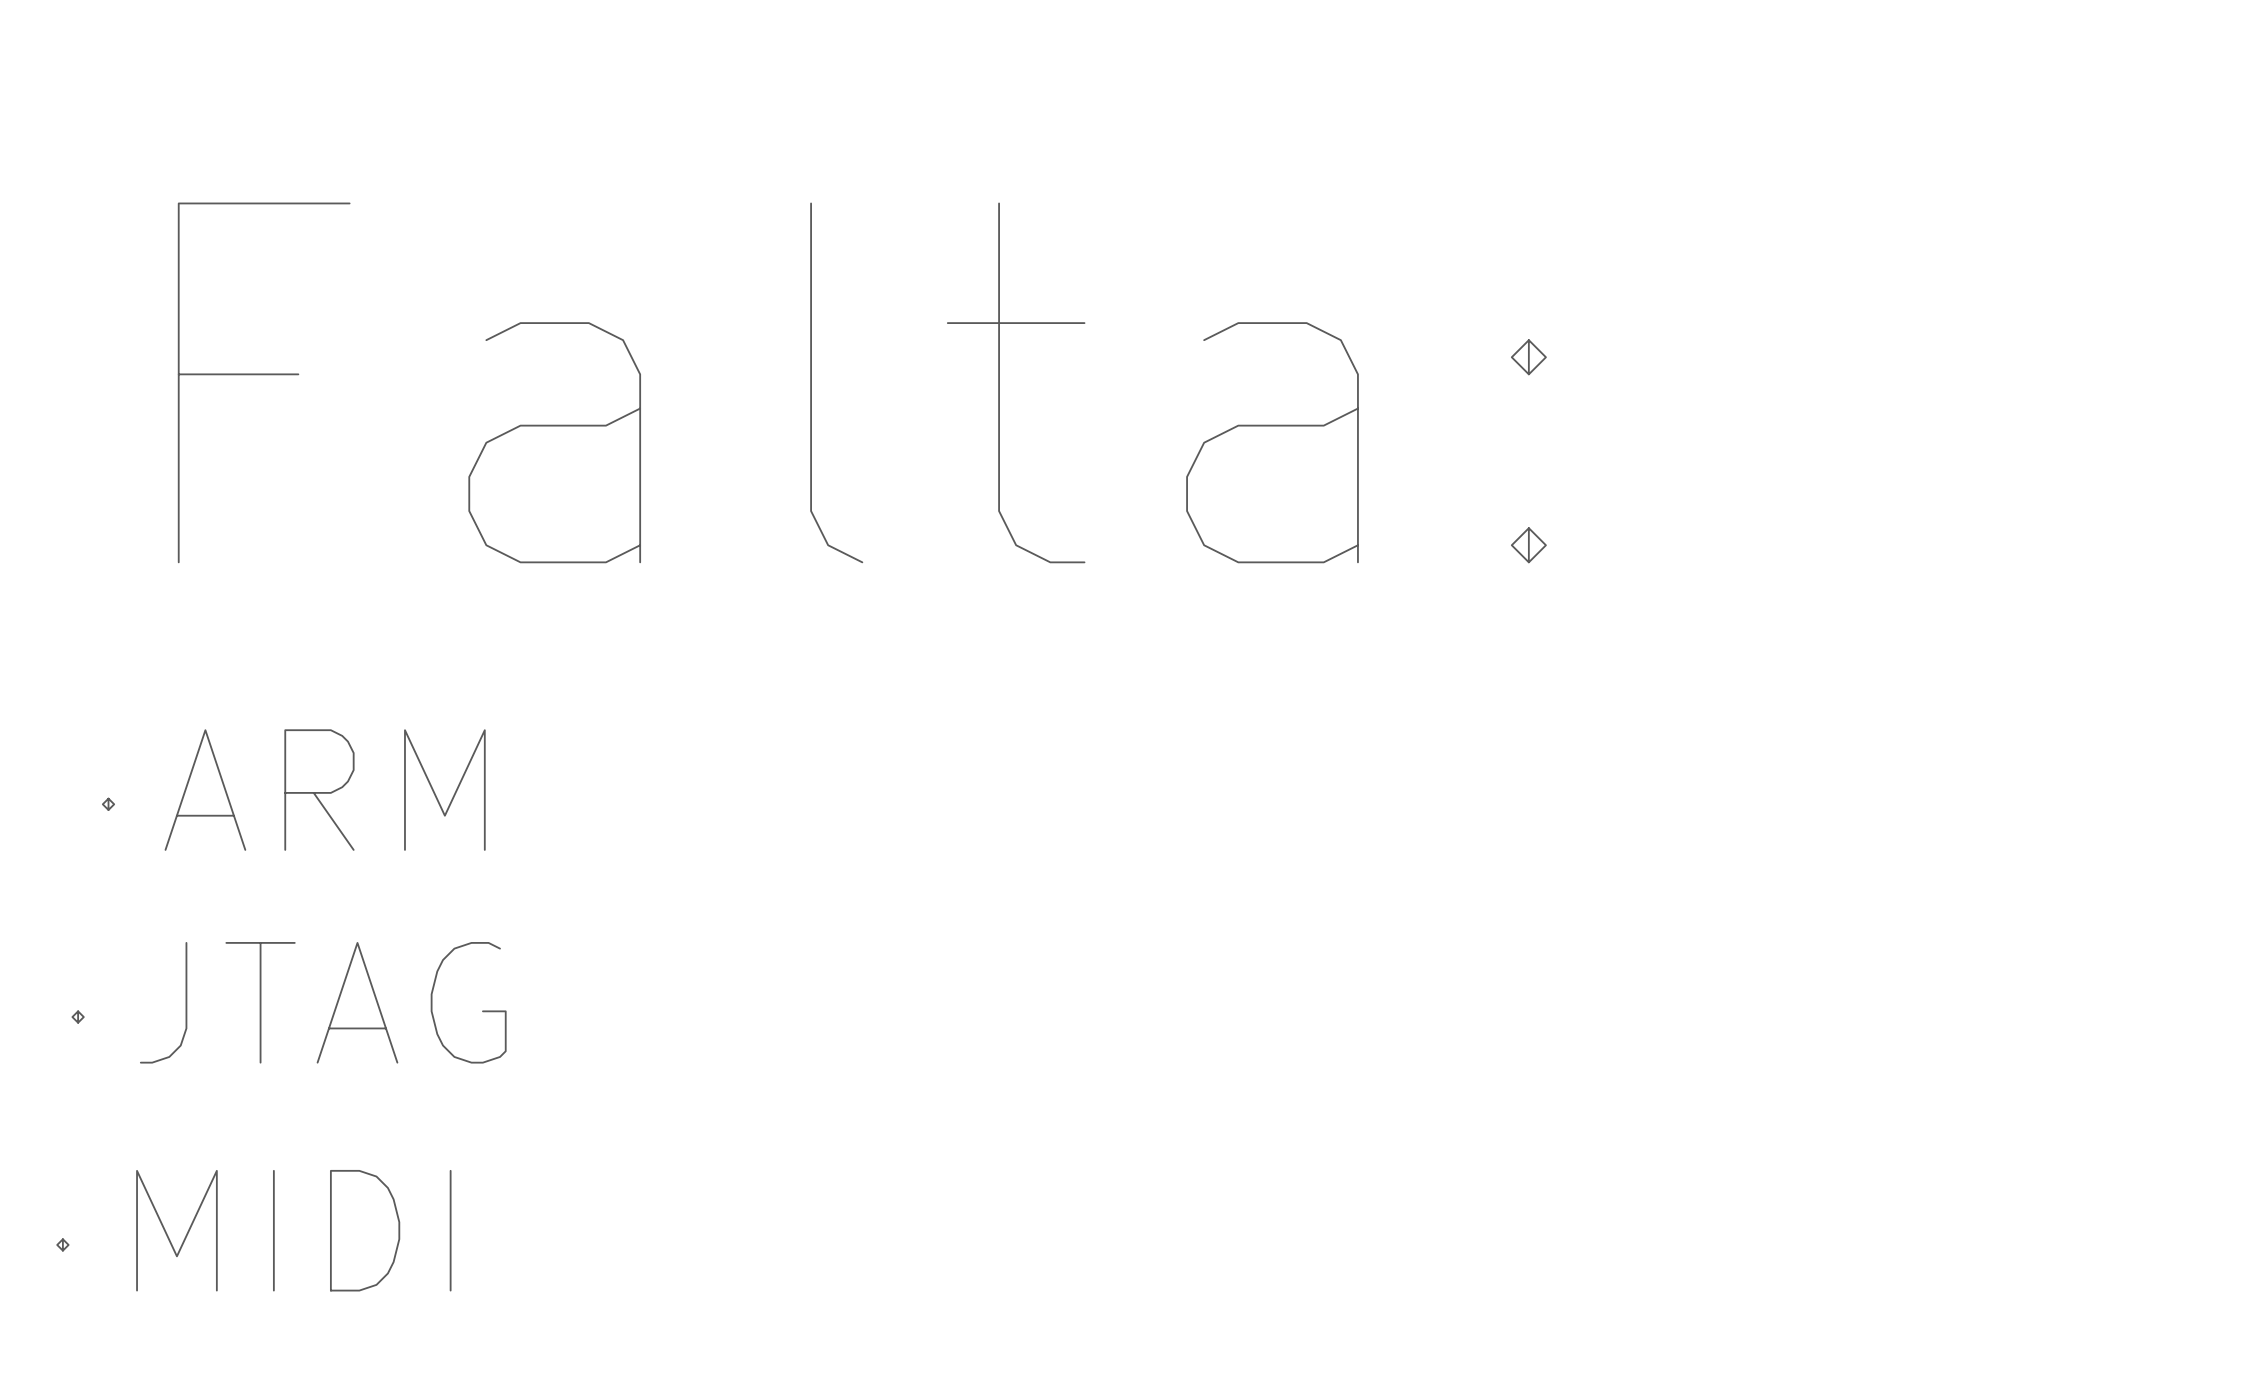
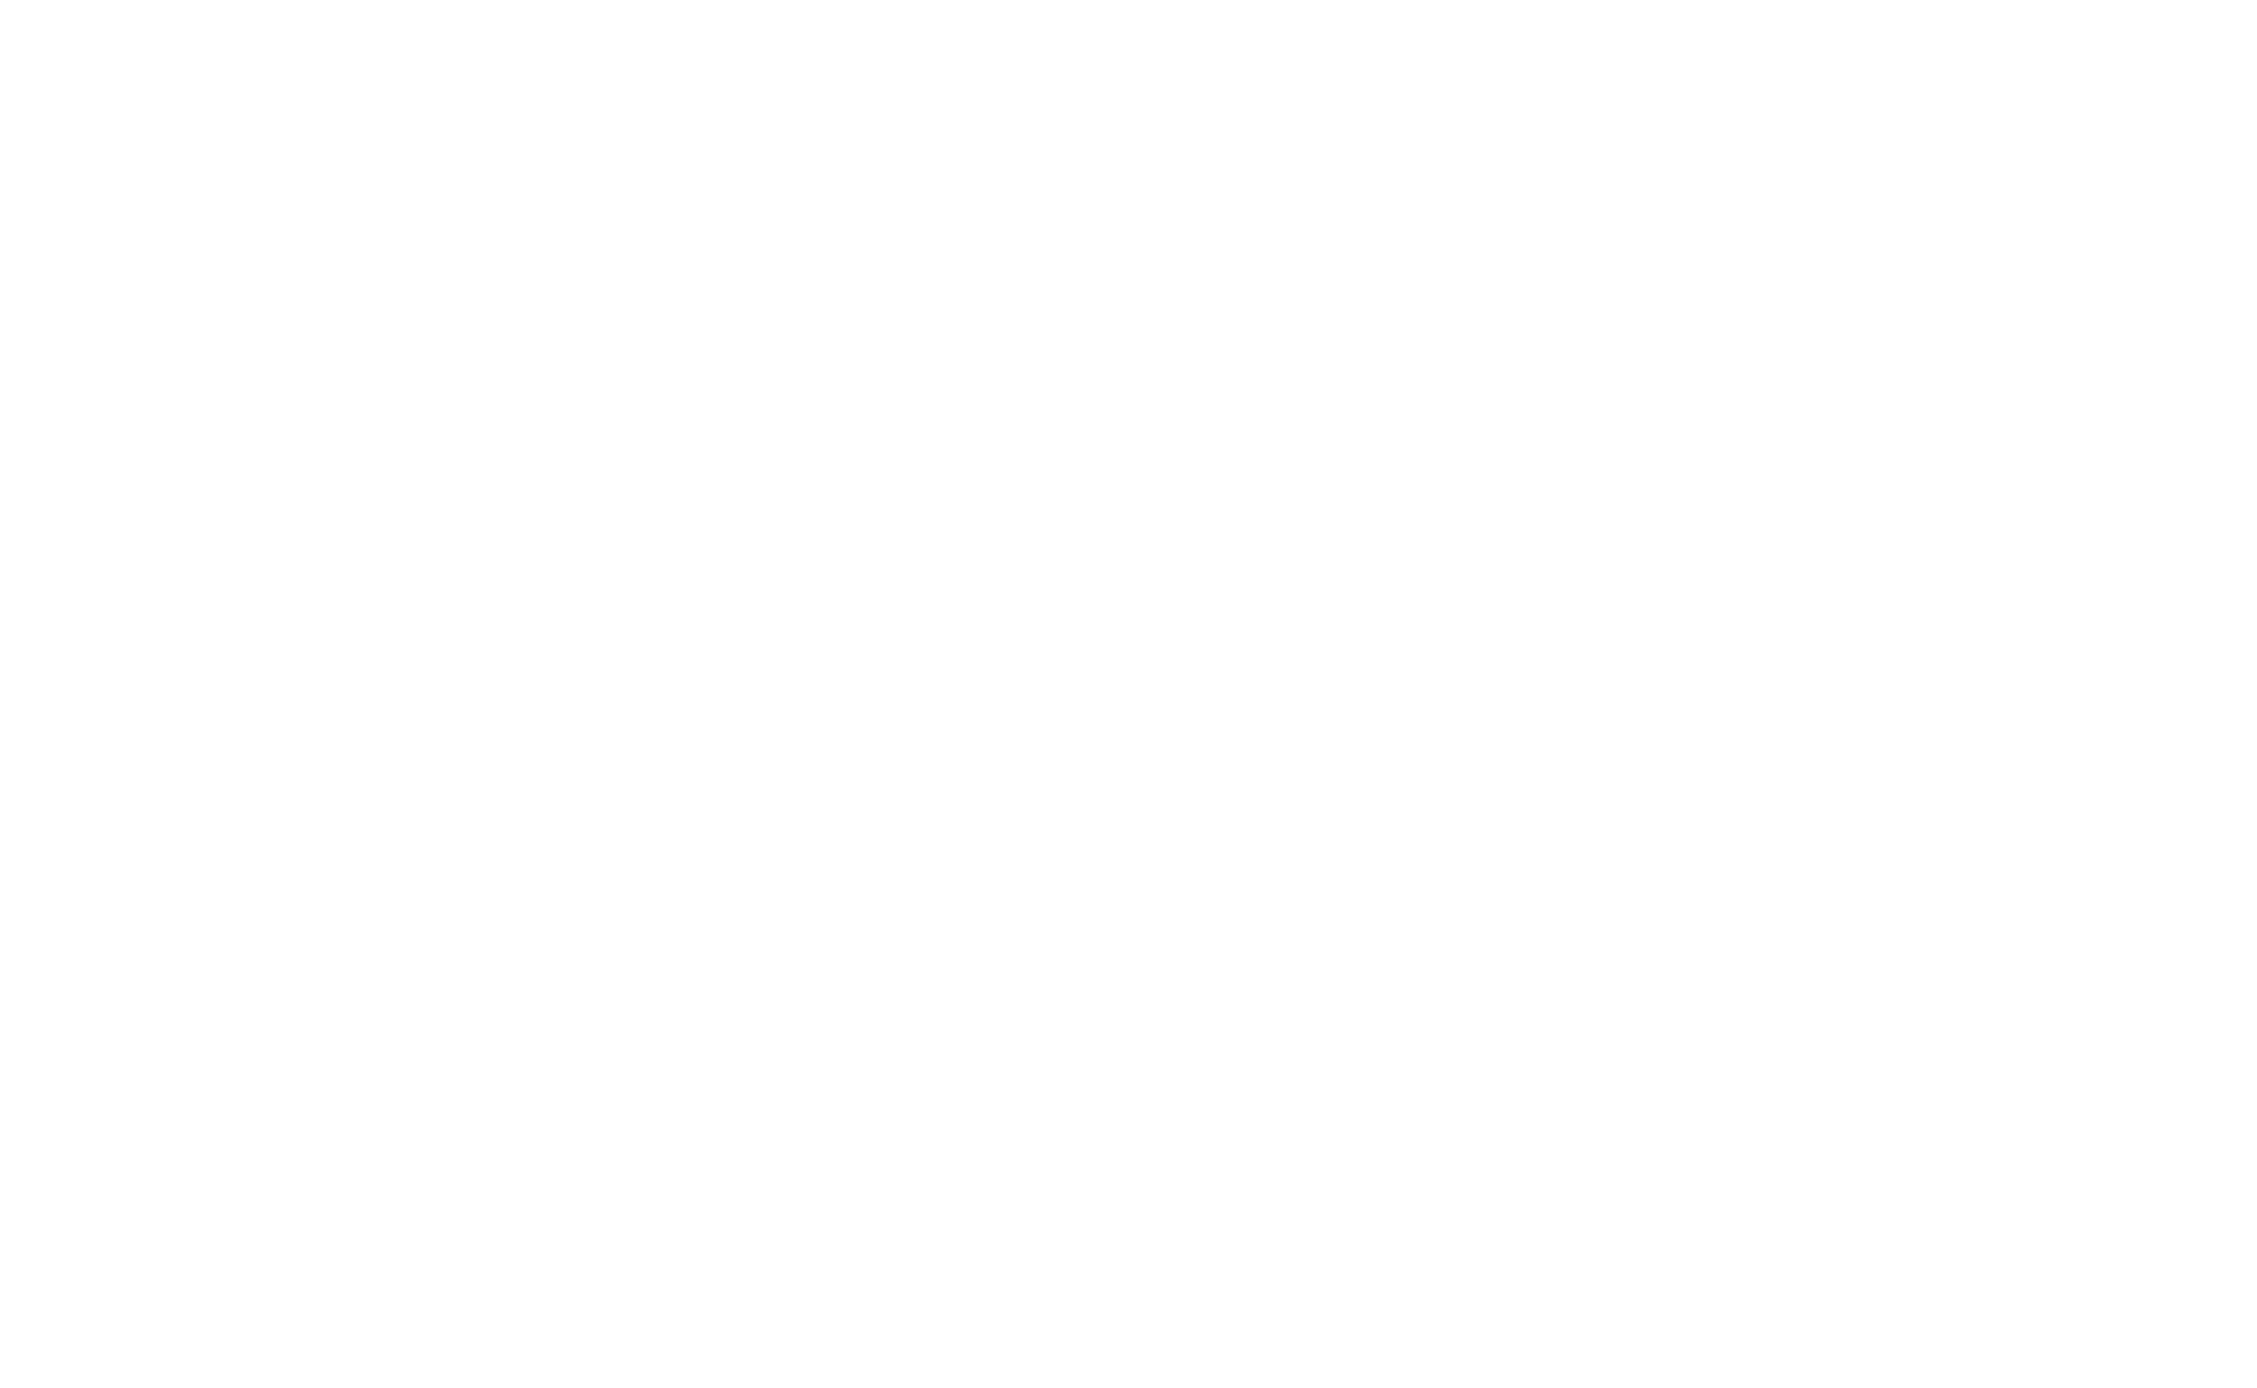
text: Falta: (862, 382) -> none
text: ·ARM (293, 790) -> none
text: ·JTAG (289, 1002) -> none
text: ·MIDI (253, 1230) -> none

